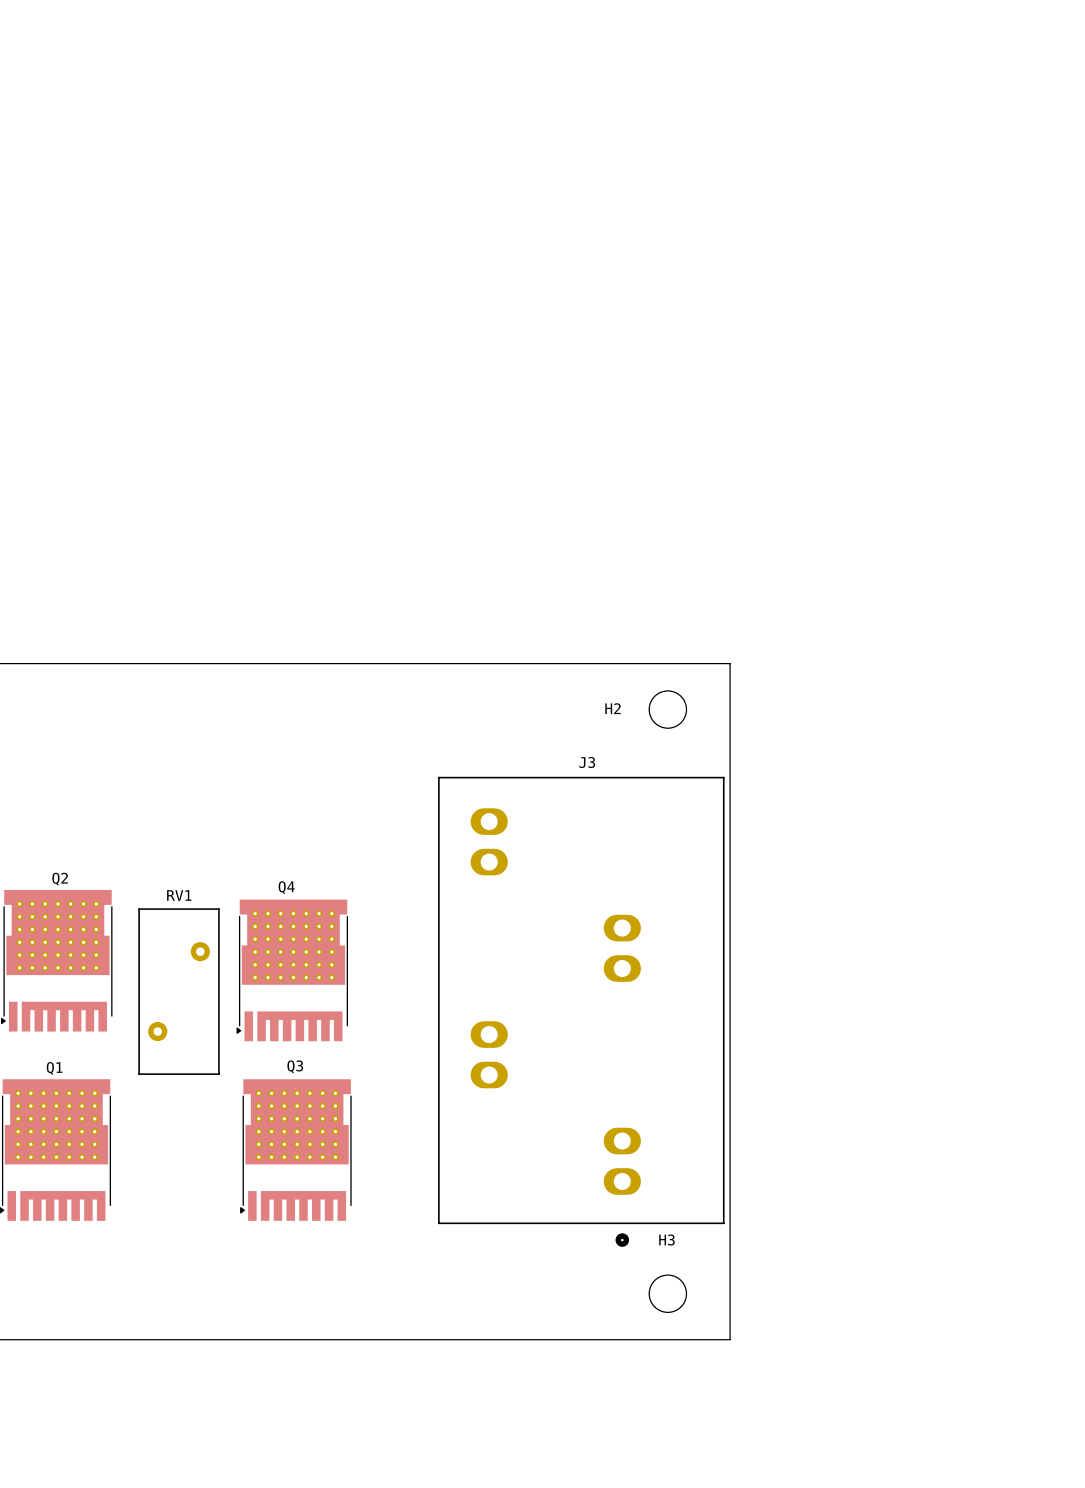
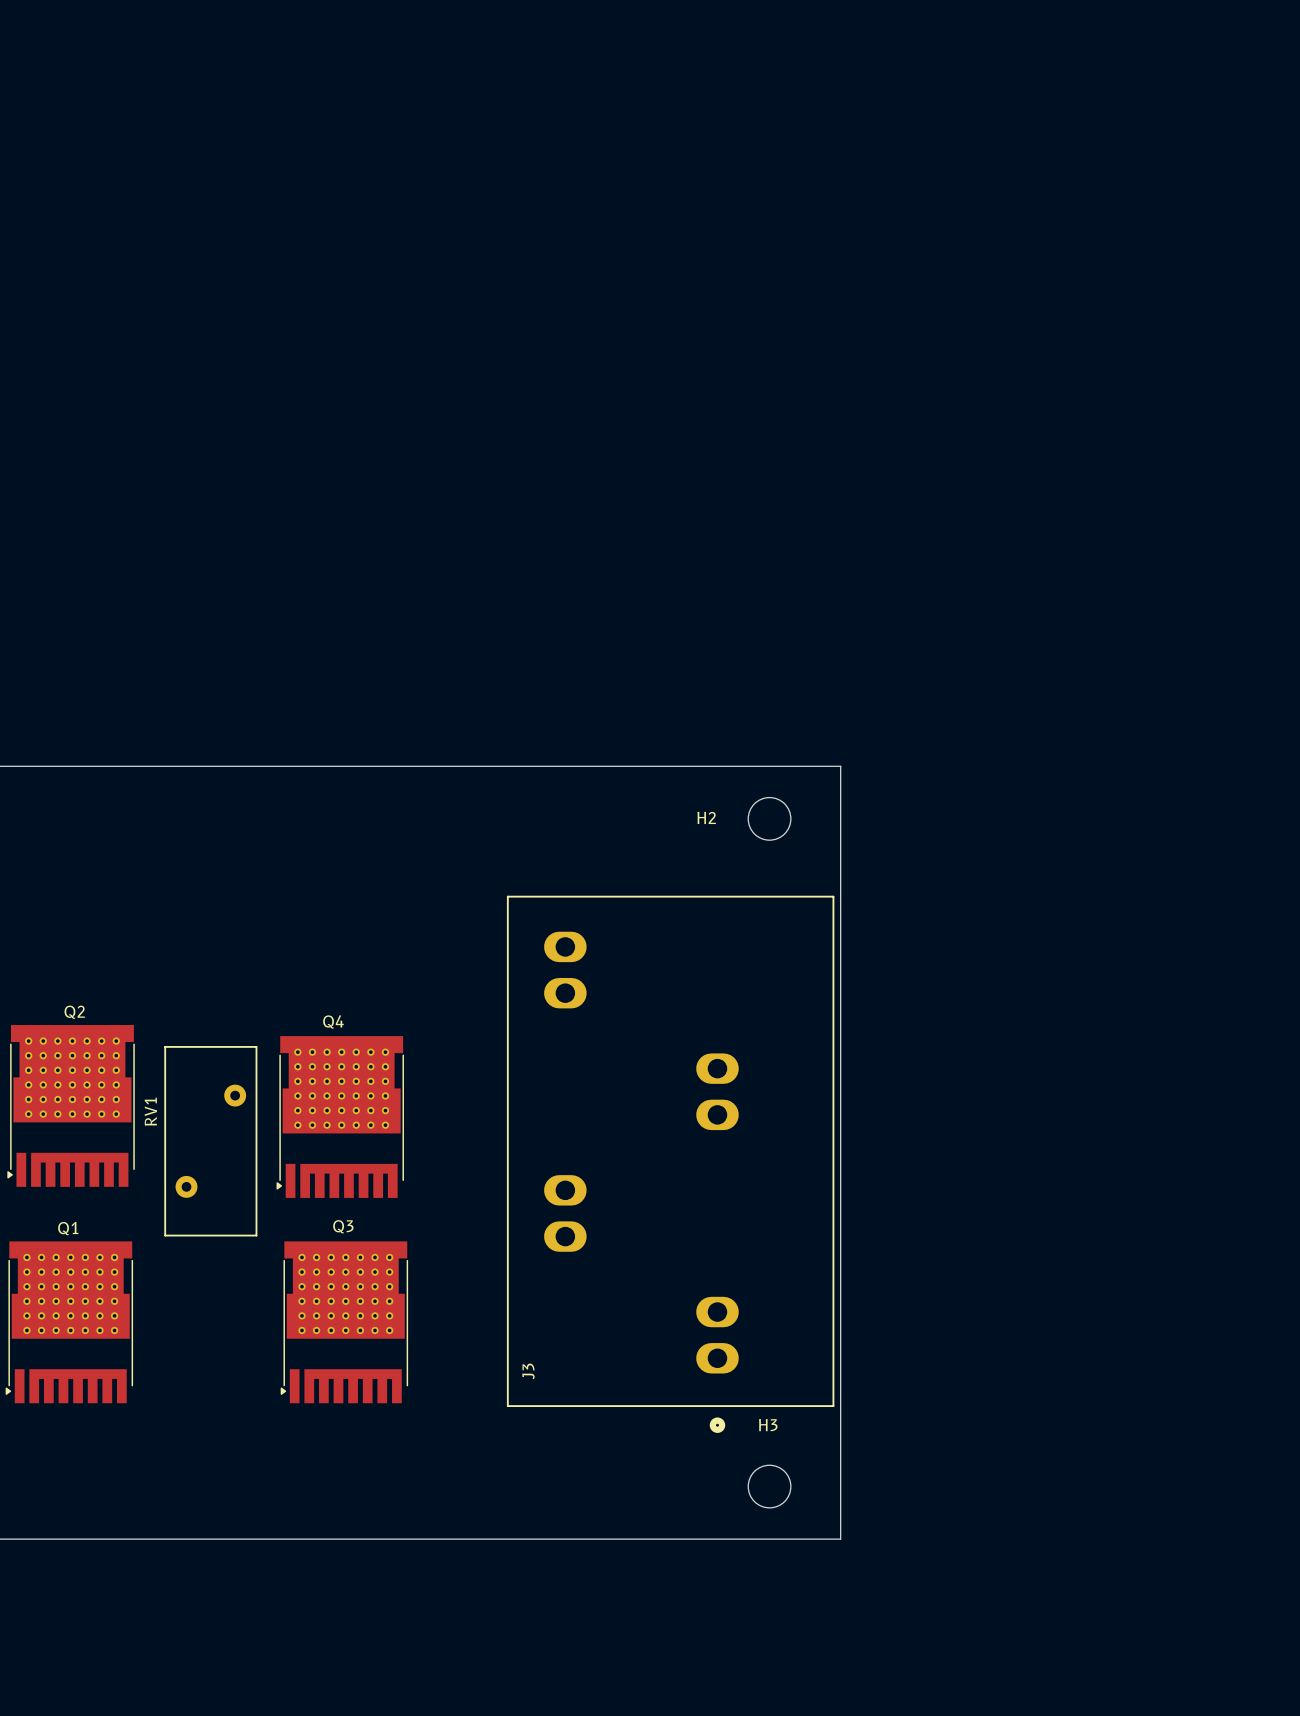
J3 name rotation: 0° (587, 762) -> 90° counterclockwise (528, 1371)
J3 name position: J3 (587, 762) -> J3 (528, 1371)
RV1 name rotation: 0° (179, 895) -> 90° counterclockwise (150, 1111)
RV1 name position: RV1 (179, 895) -> RV1 (150, 1111)

